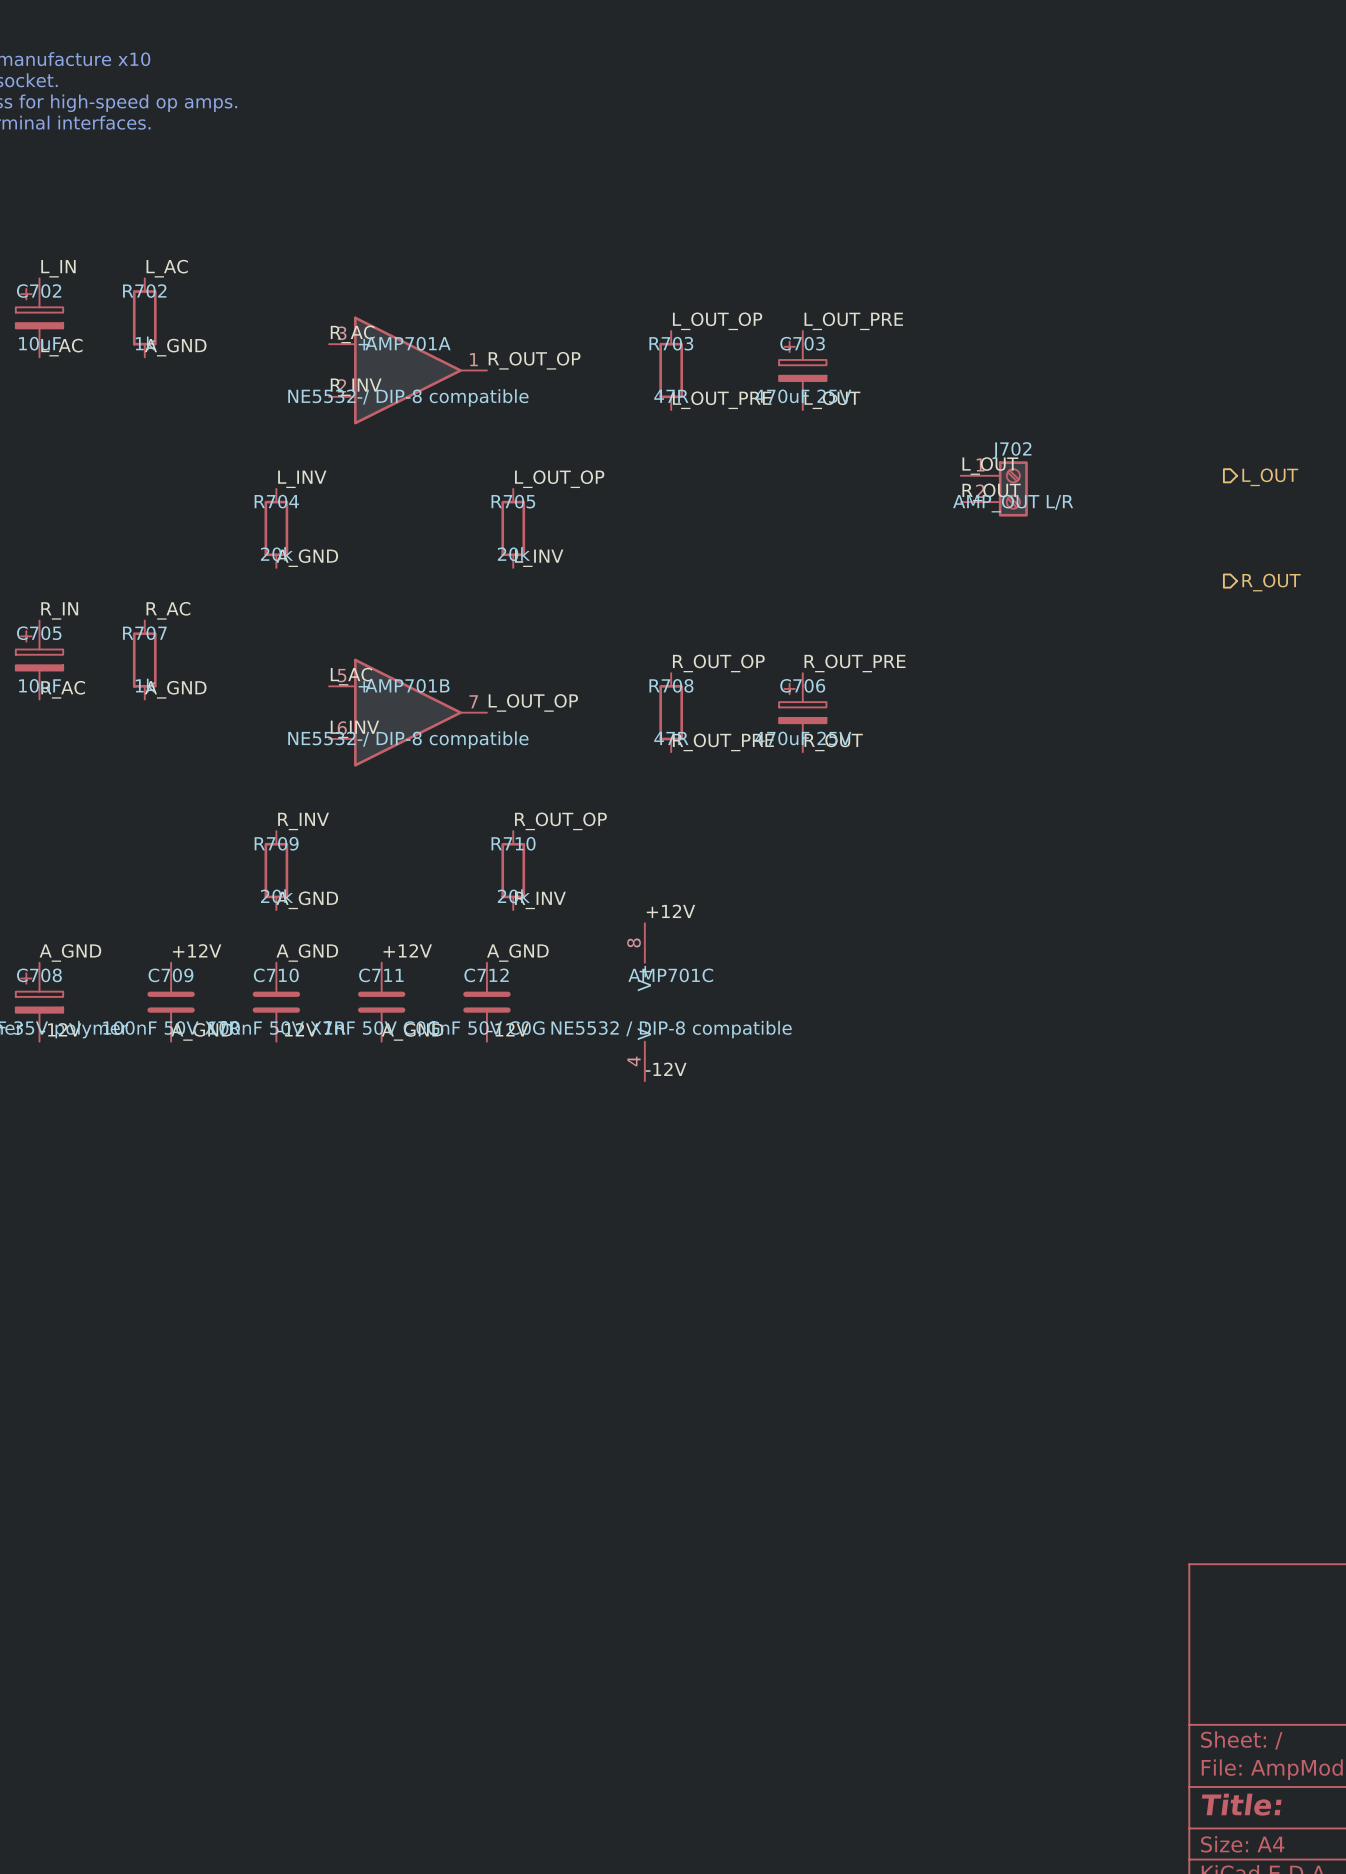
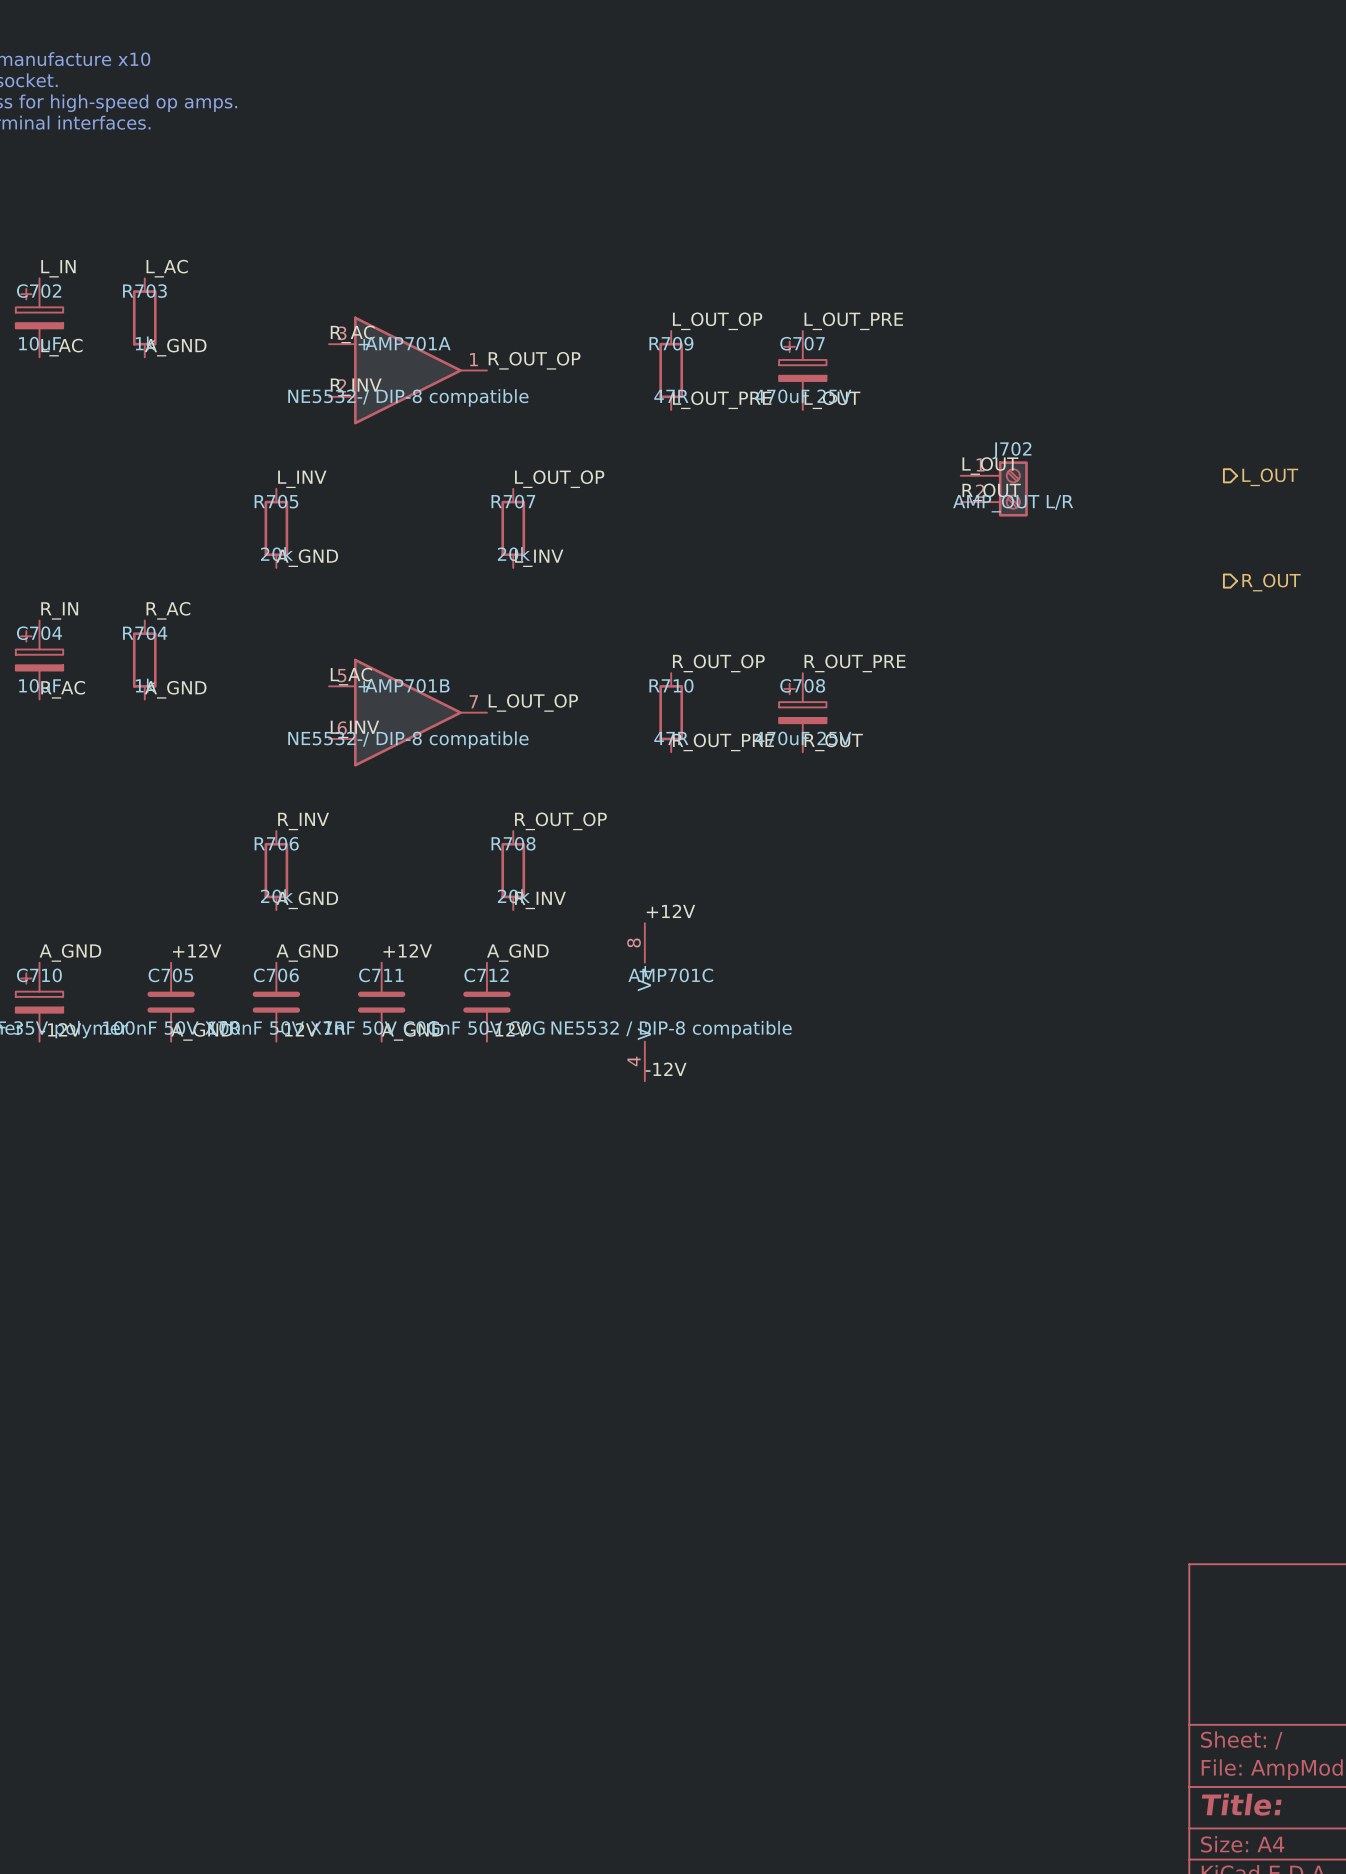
R702 name: R702 (144, 291) -> R703 (144, 291)
R703 name: R703 (671, 343) -> R709 (671, 343)
C703 name: C703 (802, 343) -> C707 (802, 343)
R704 name: R704 (276, 501) -> R705 (276, 501)
R705 name: R705 (513, 501) -> R707 (513, 501)
C705 name: C705 (39, 633) -> C704 (39, 633)
R707 name: R707 (144, 633) -> R704 (145, 633)
R708 name: R708 (671, 685) -> R710 (671, 685)
C706 name: C706 (802, 685) -> C708 (802, 685)
R709 name: R709 (276, 843) -> R706 (276, 843)
R710 name: R710 (513, 843) -> R708 (513, 843)
C708 name: C708 (39, 975) -> C710 (39, 975)
C709 name: C709 (170, 975) -> C705 (170, 975)
C710 name: C710 (276, 975) -> C706 (276, 975)

